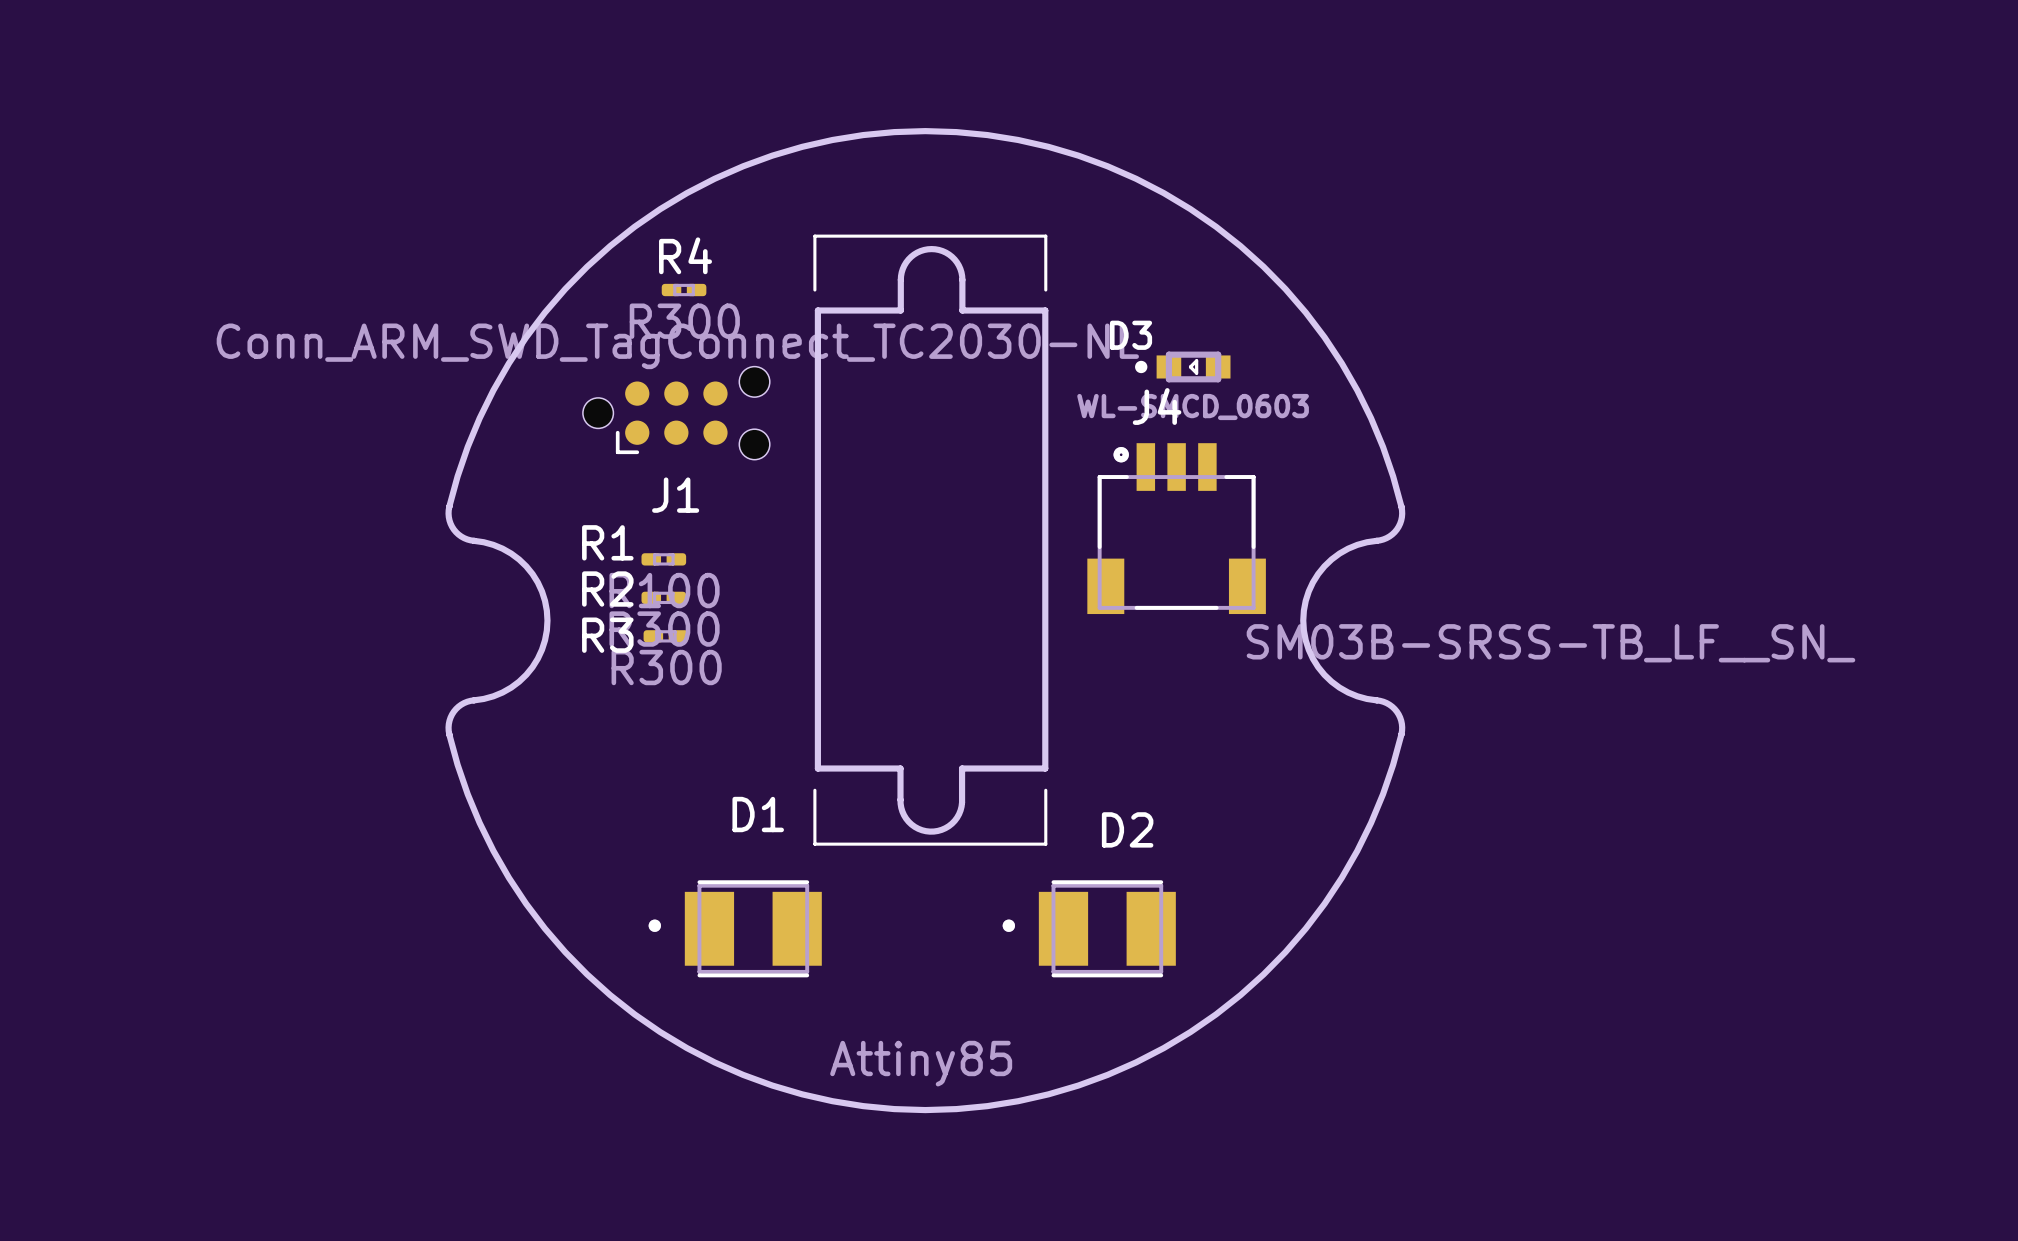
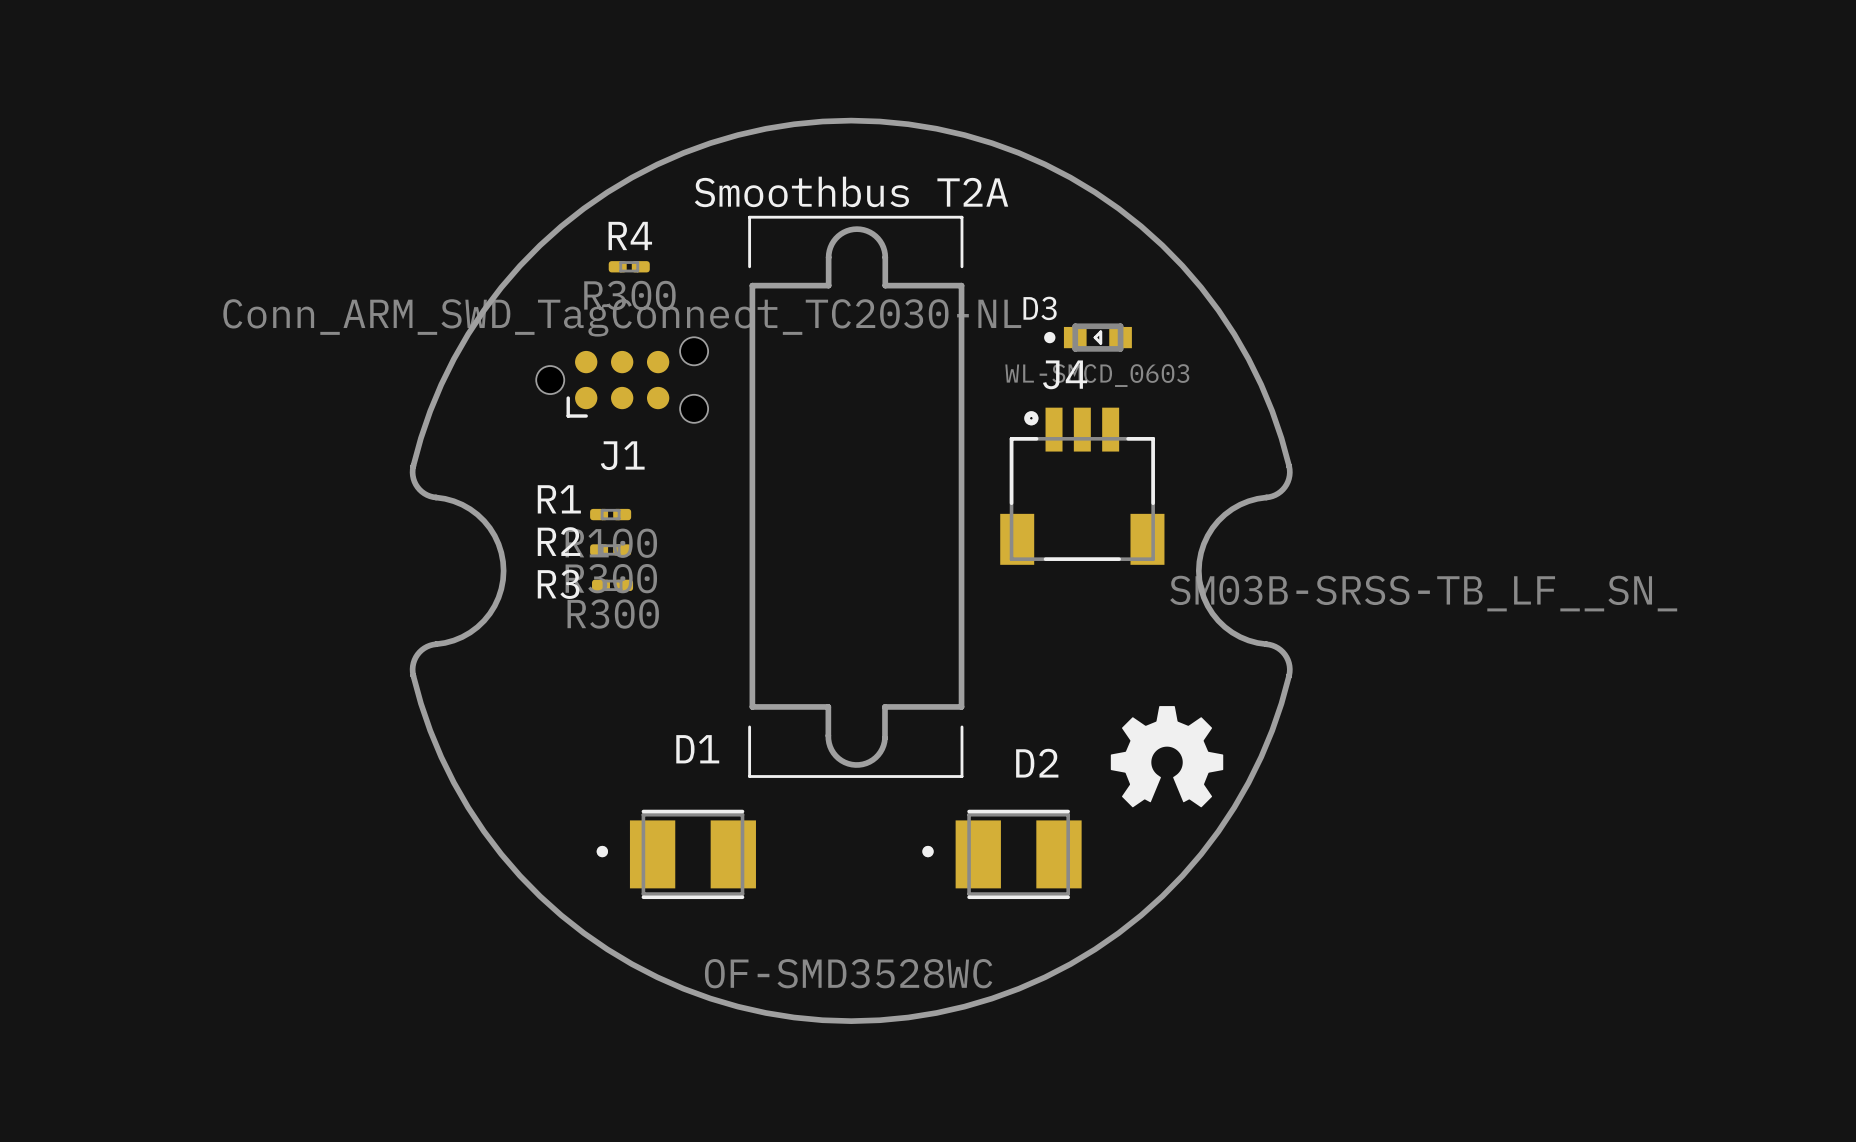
text: none -> Smoothbus T2A (851, 191)
drawing: none -> [1110, 706, 1224, 808]
D1 value: Attiny85 (921, 1063) -> OF-SMD3528WC (848, 973)

